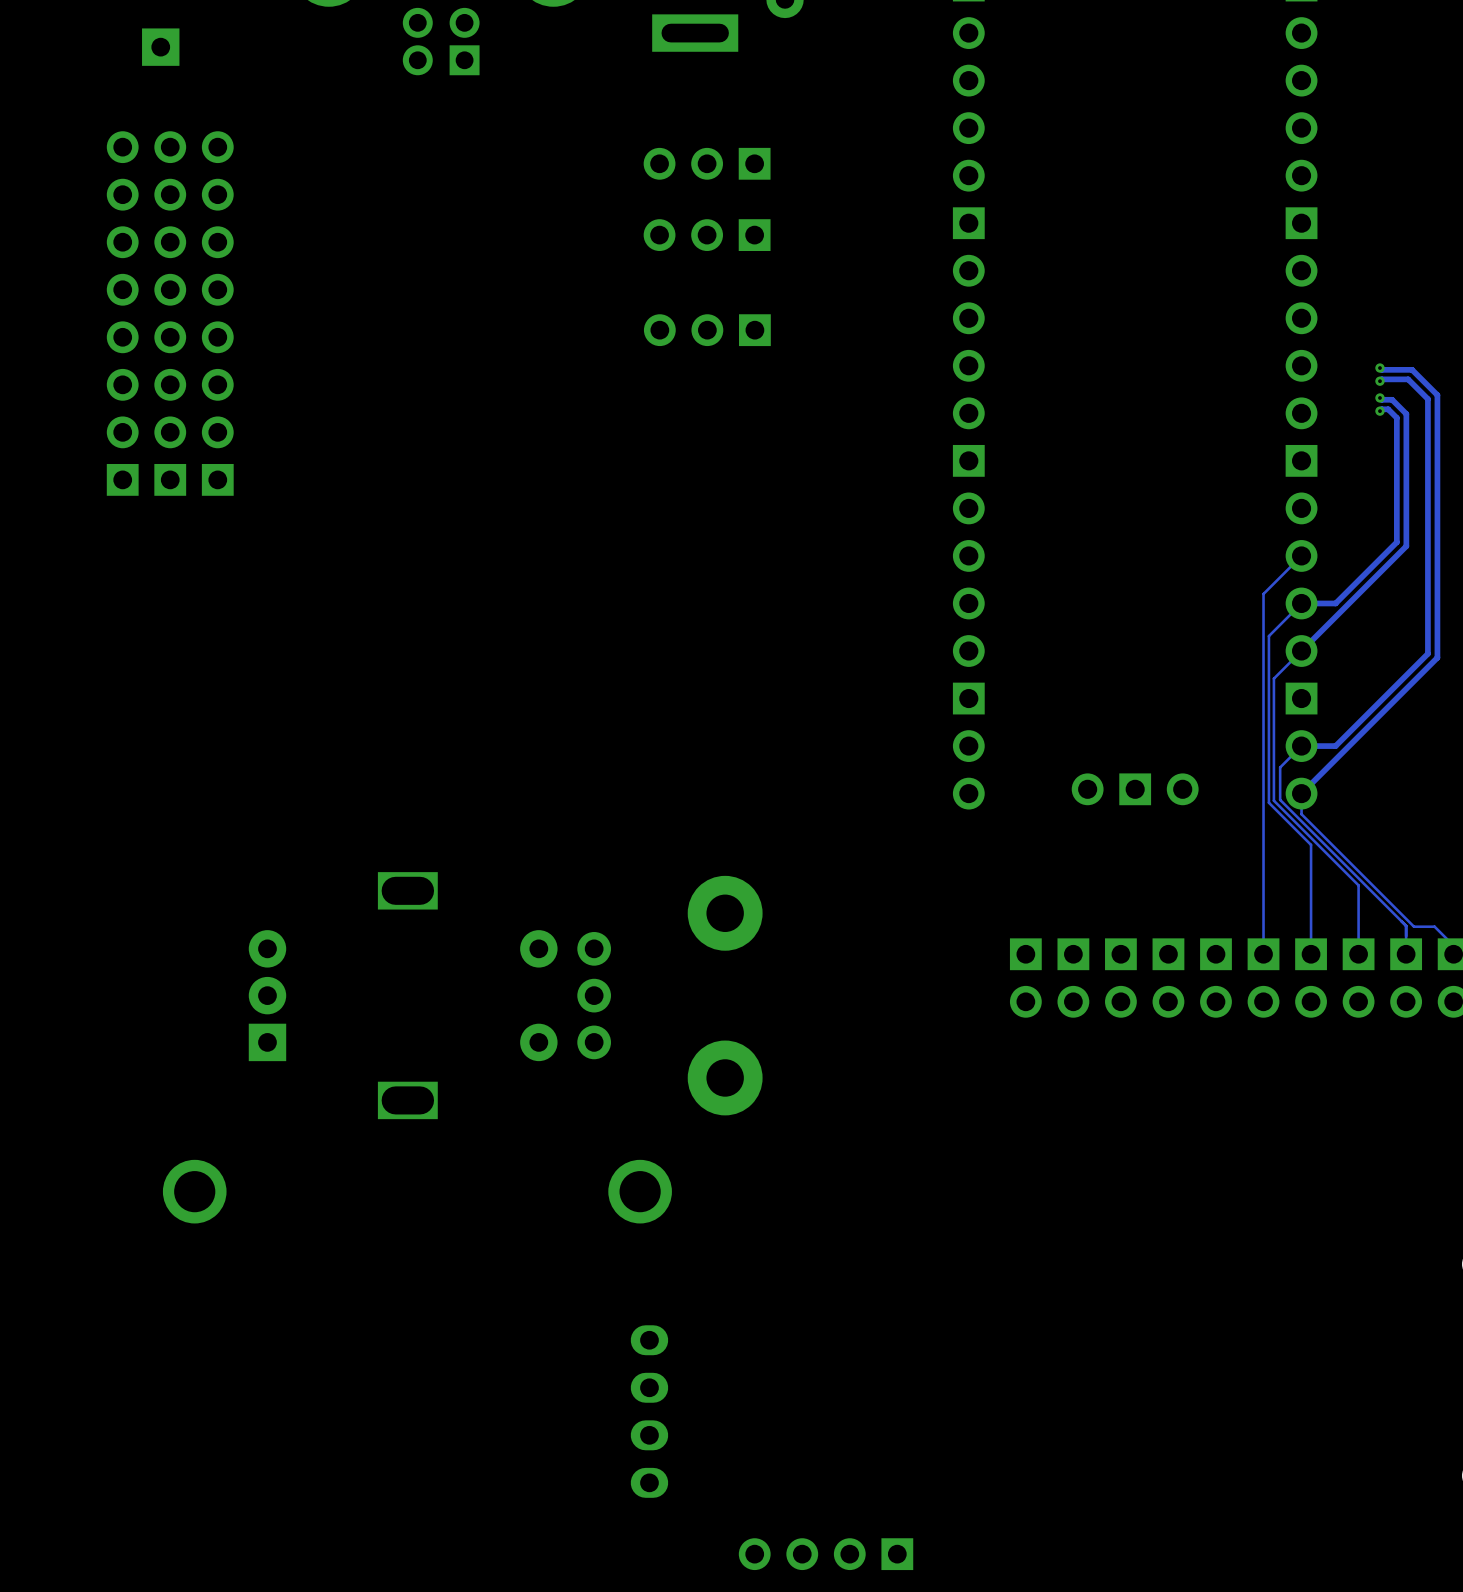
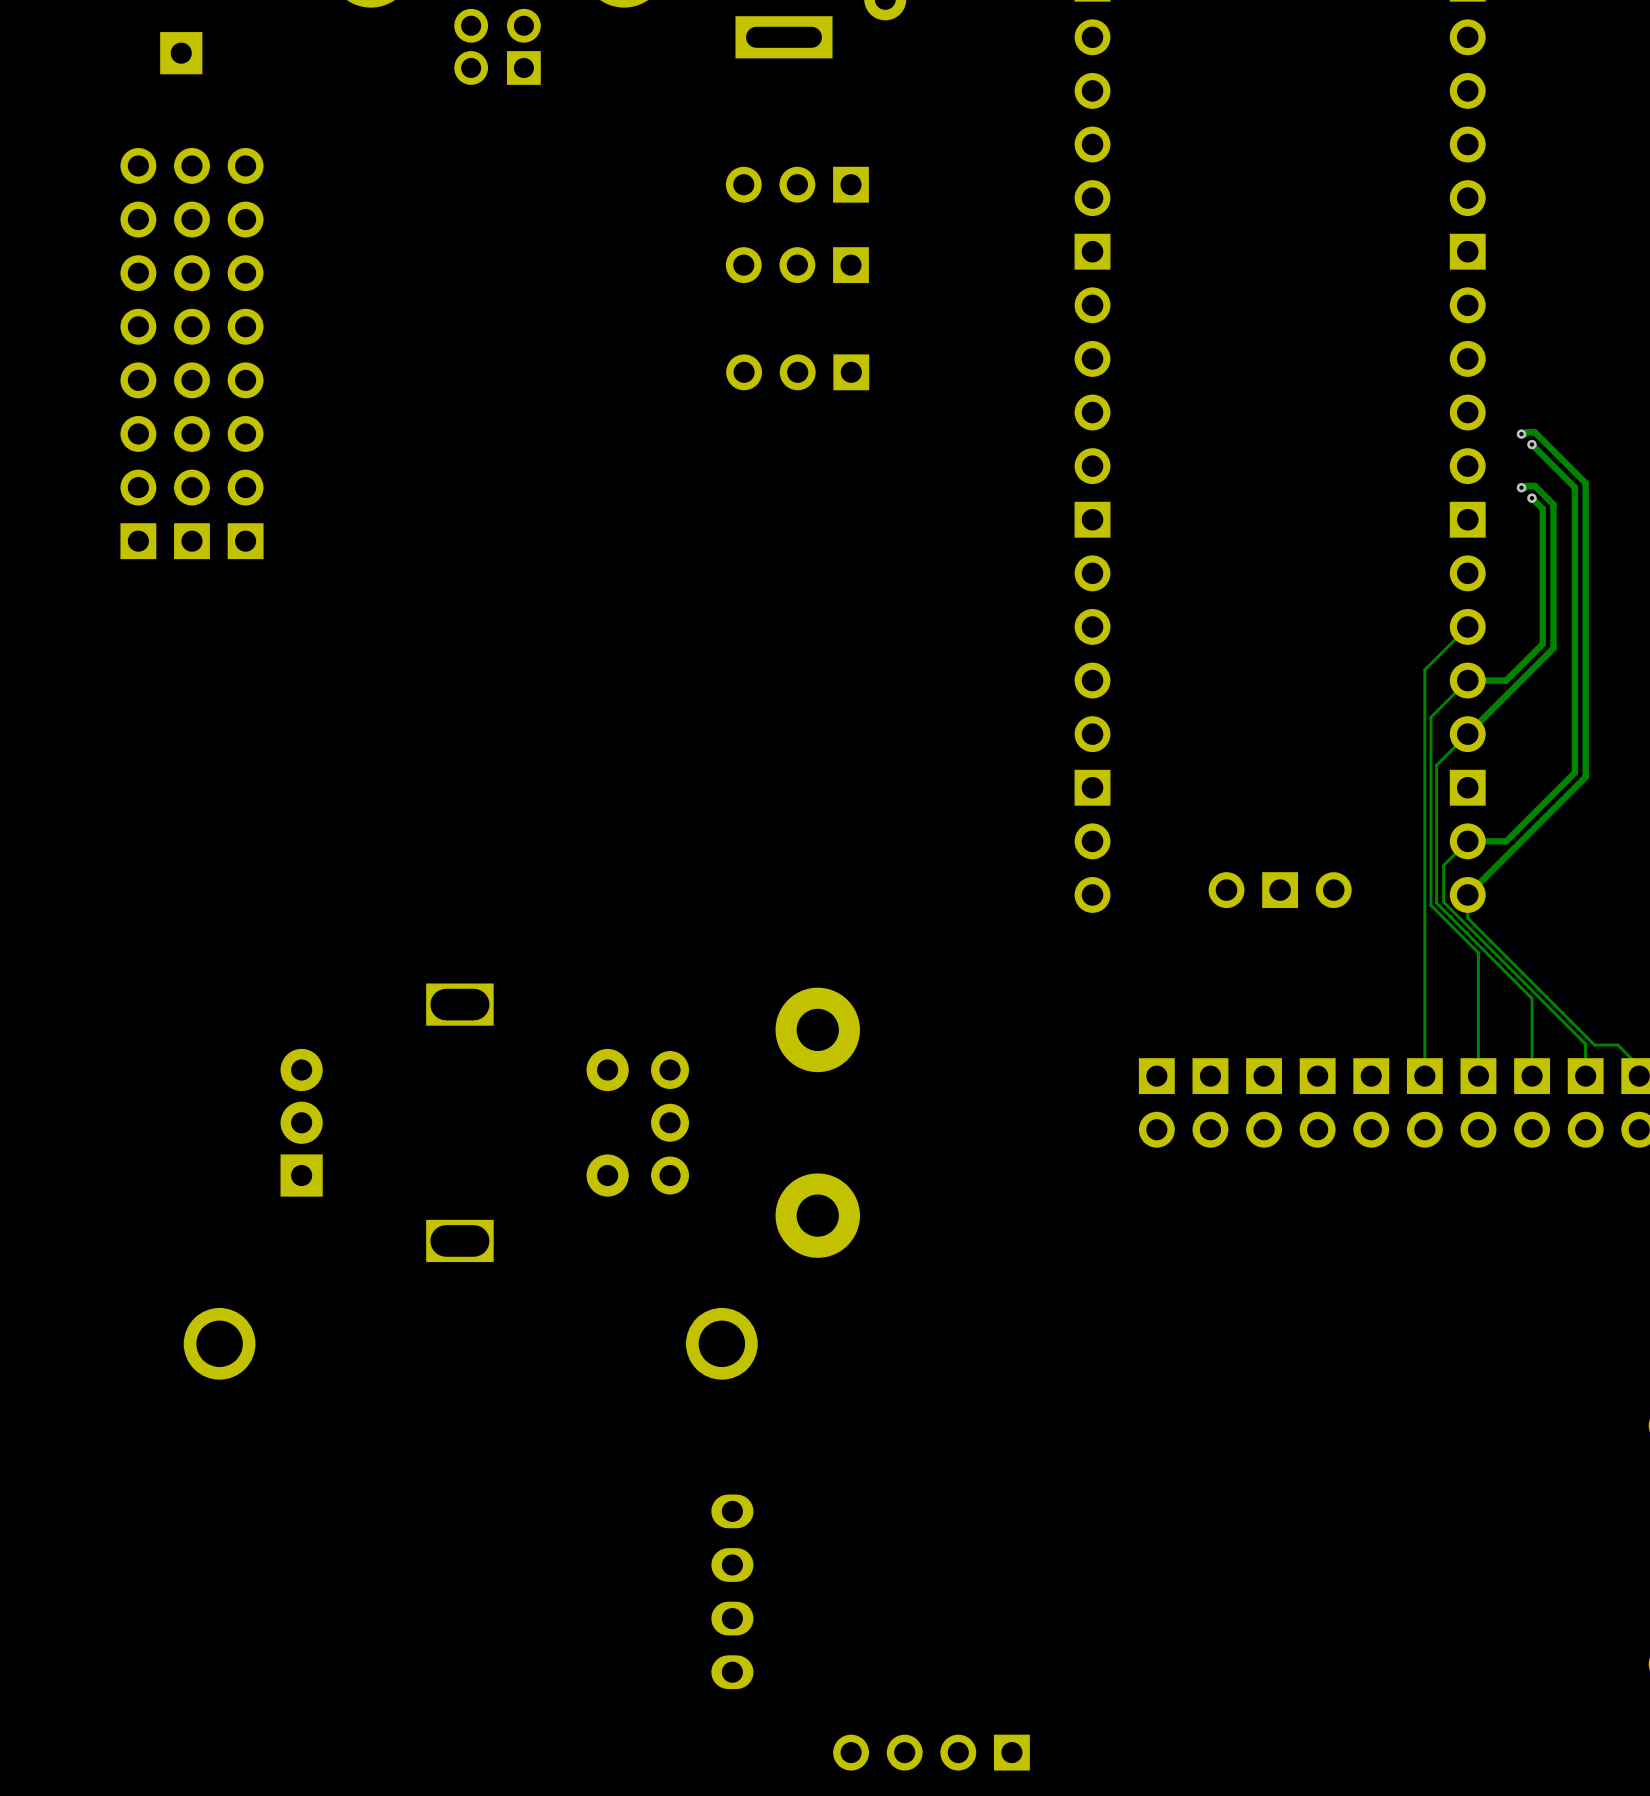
track: (1379, 368) (1381, 369) (1412, 369) (1437, 395) (1437, 657) (1406, 689) -> (1521, 434) (1534, 432) (1585, 483) (1585, 777)
via: (1379, 368) -> none
track: (1379, 381) (1381, 379) (1408, 379) (1427, 399) (1427, 653) (1396, 685) -> (1531, 444) (1574, 487) (1574, 772)
via: (1379, 381) -> none
via: none -> (1521, 434)
via: none -> (1531, 444)
track: (1379, 397) (1381, 399) (1392, 399) (1406, 413) (1406, 546) (1377, 574) -> (1521, 487) (1534, 485) (1553, 504) (1553, 648)
via: (1379, 397) -> none
track: (1379, 411) (1388, 409) (1396, 417) (1396, 542) (1368, 571) -> (1531, 498) (1542, 509) (1542, 643)
via: (1379, 411) -> none
via: none -> (1521, 487)
via: none -> (1531, 498)

